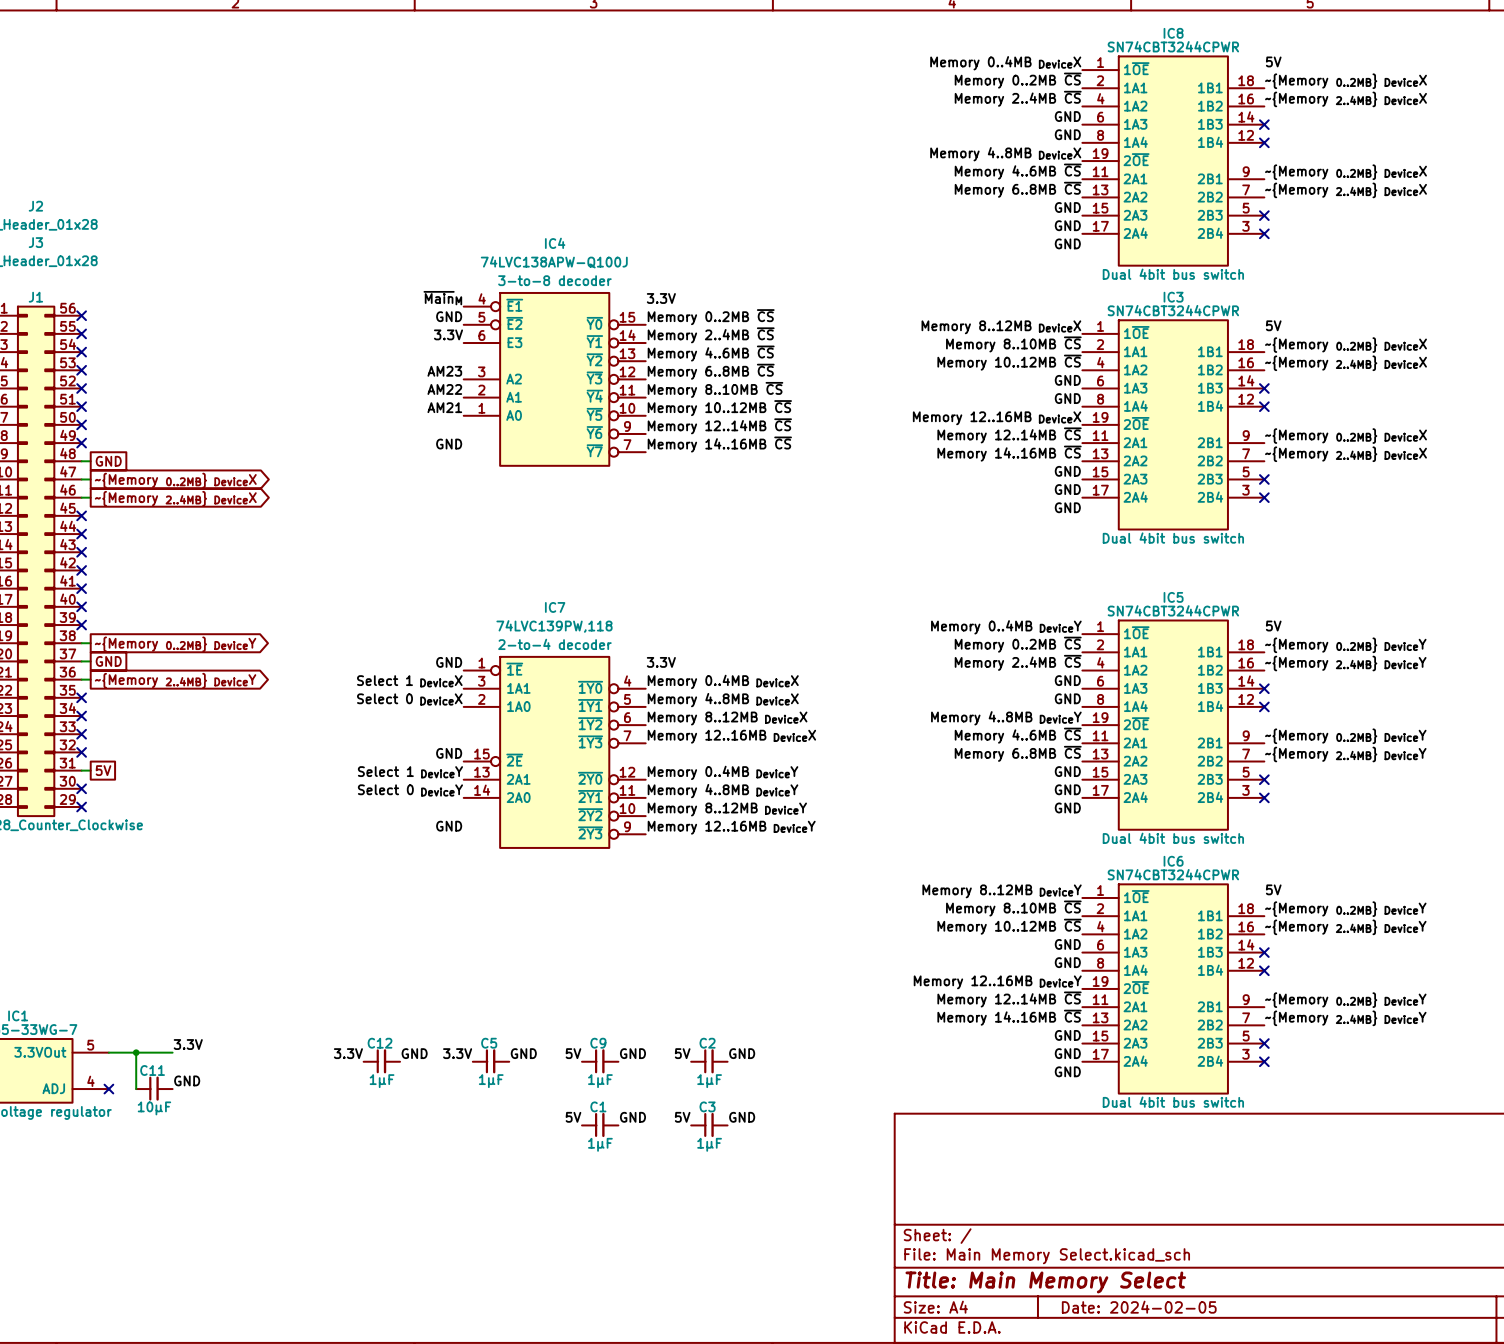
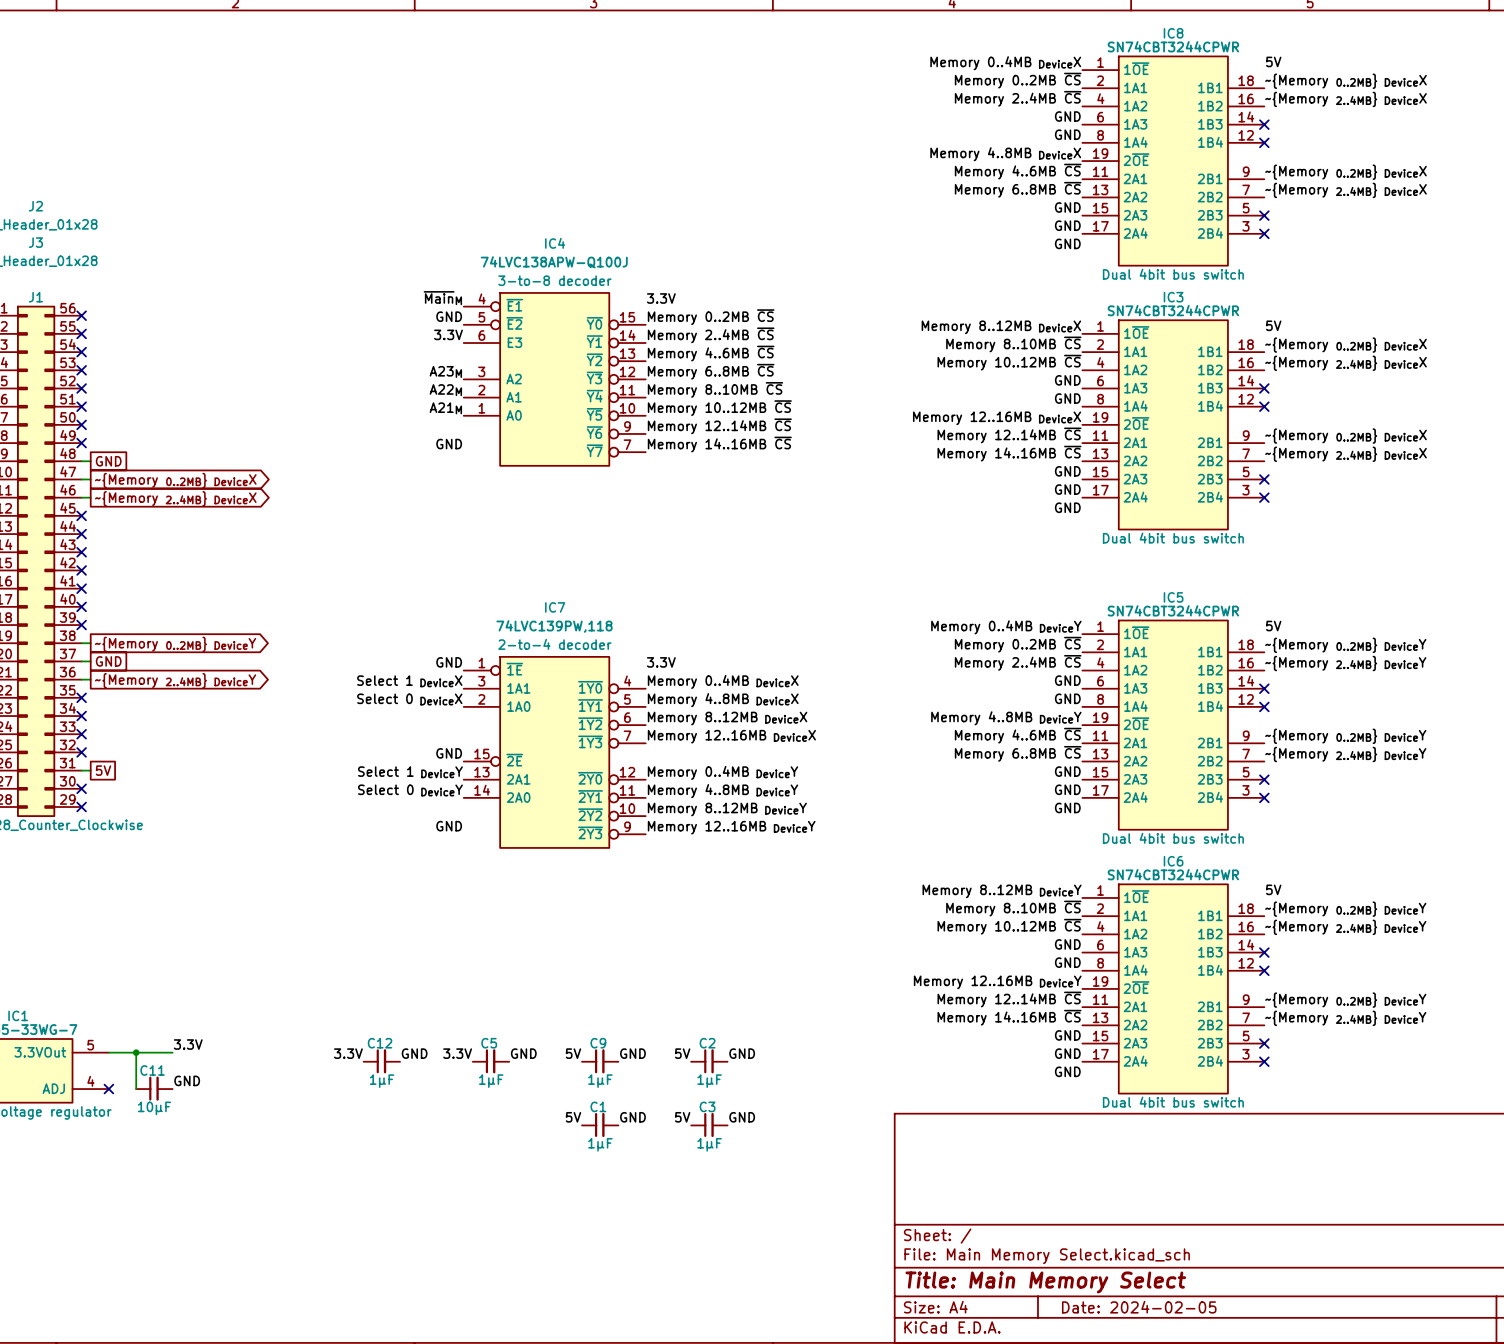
label: AM23 (444, 371) -> A23M (445, 371)
label: AM22 (444, 389) -> A22M (445, 390)
label: AM21 (444, 407) -> A21M (445, 408)

